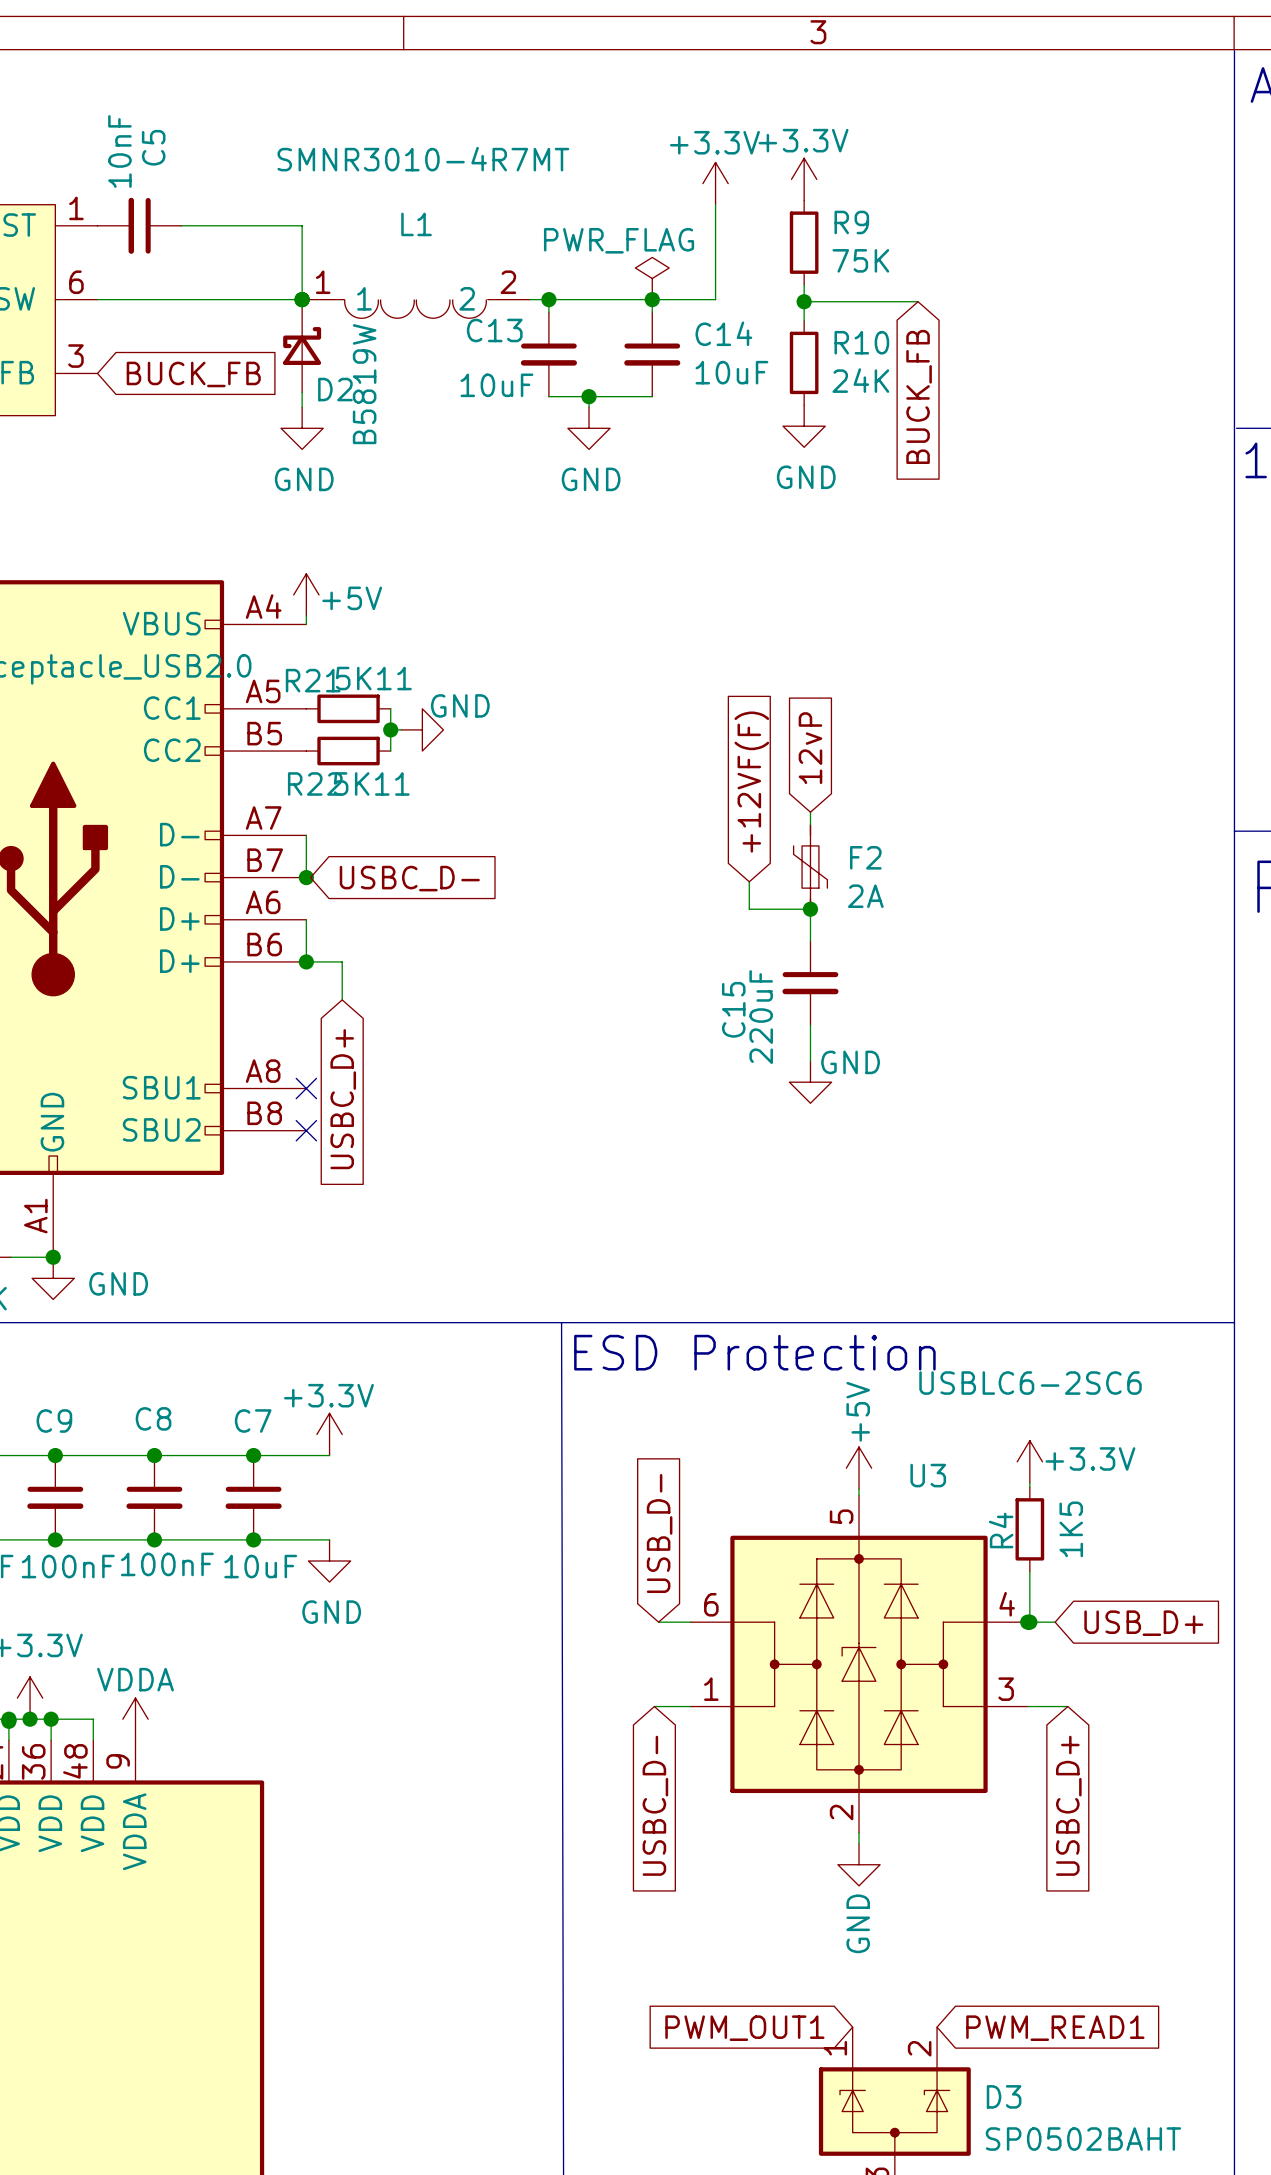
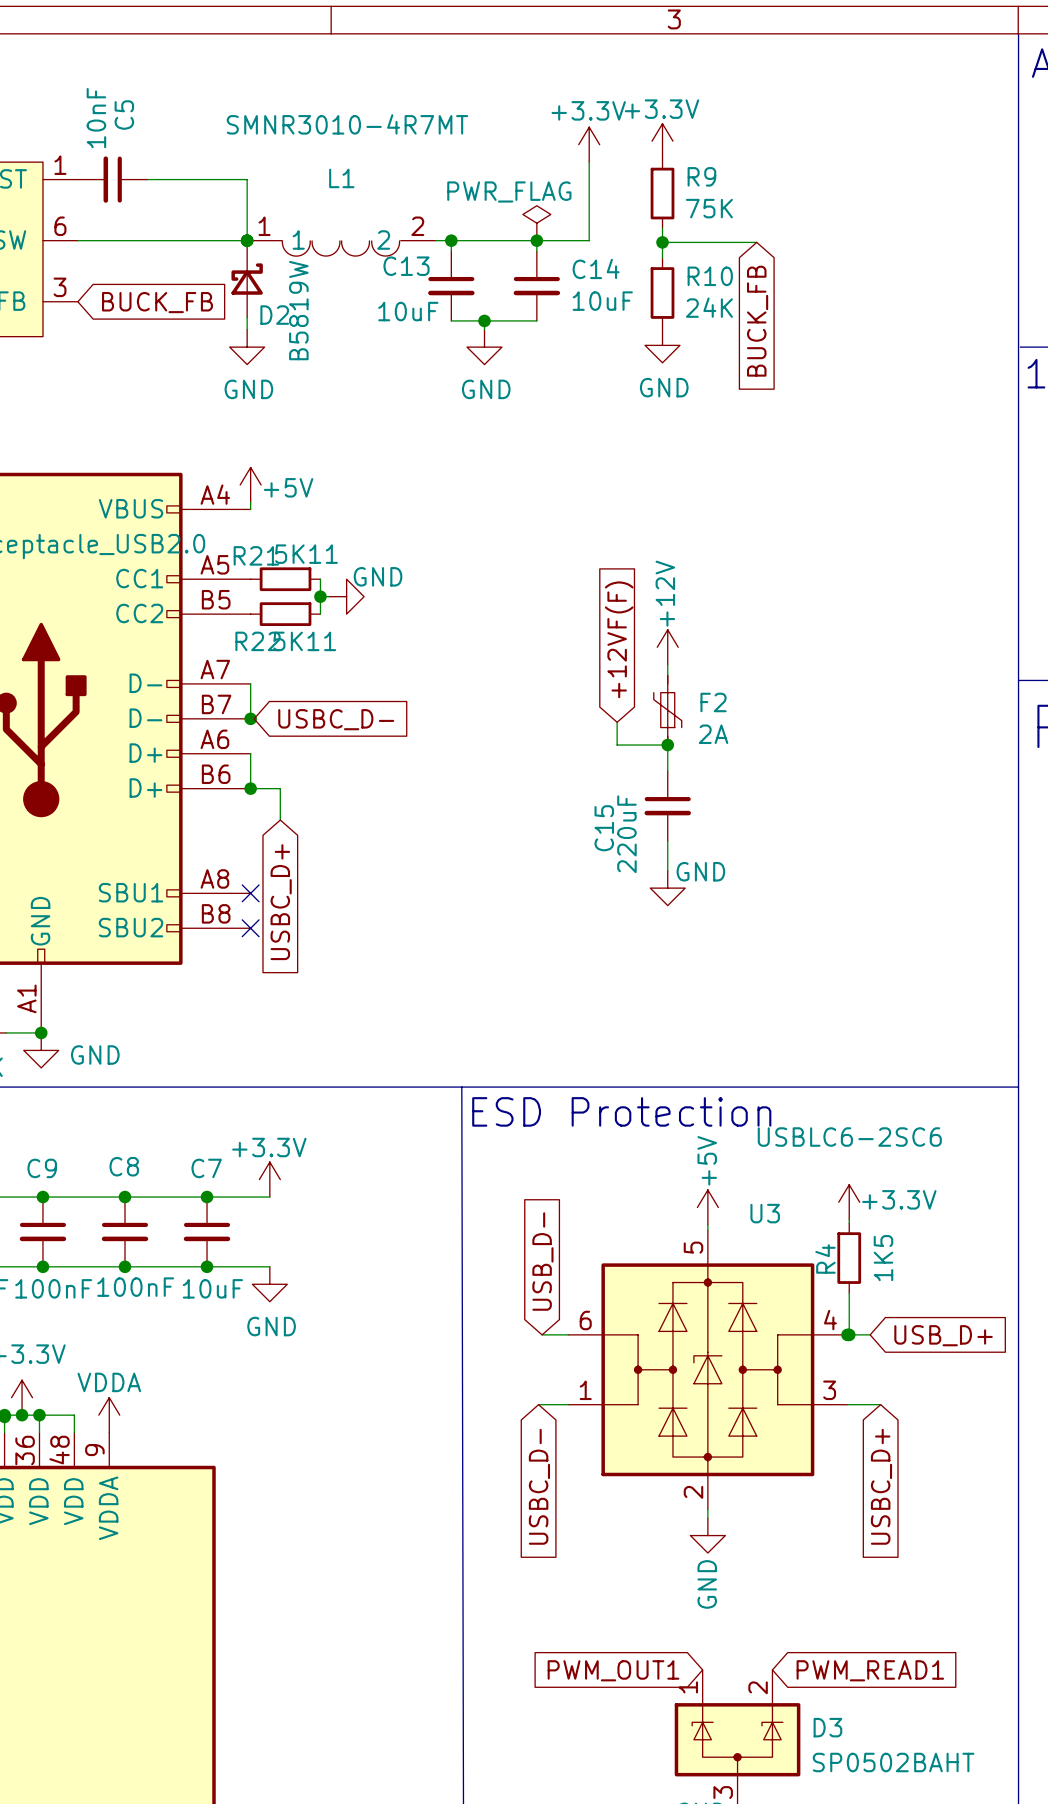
global label: 12vP (810, 748) -> none
power symbol: none -> +12V (667, 647)

